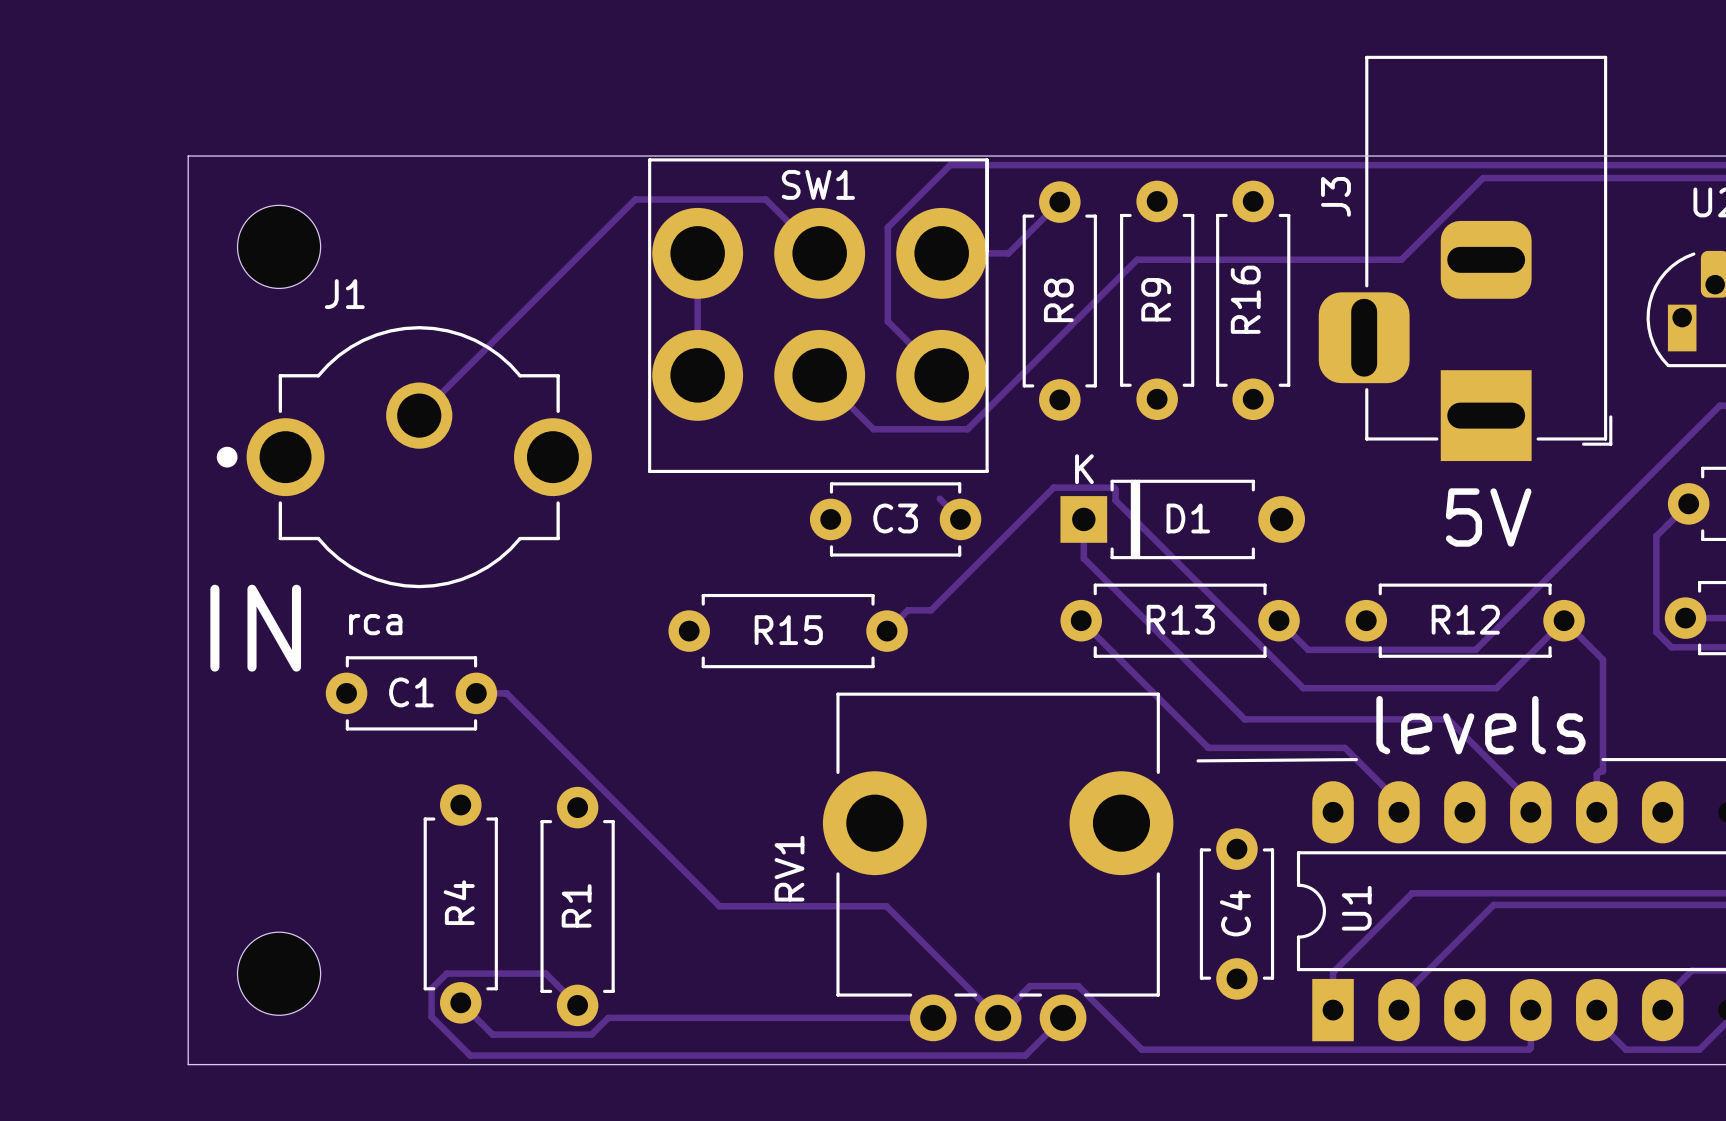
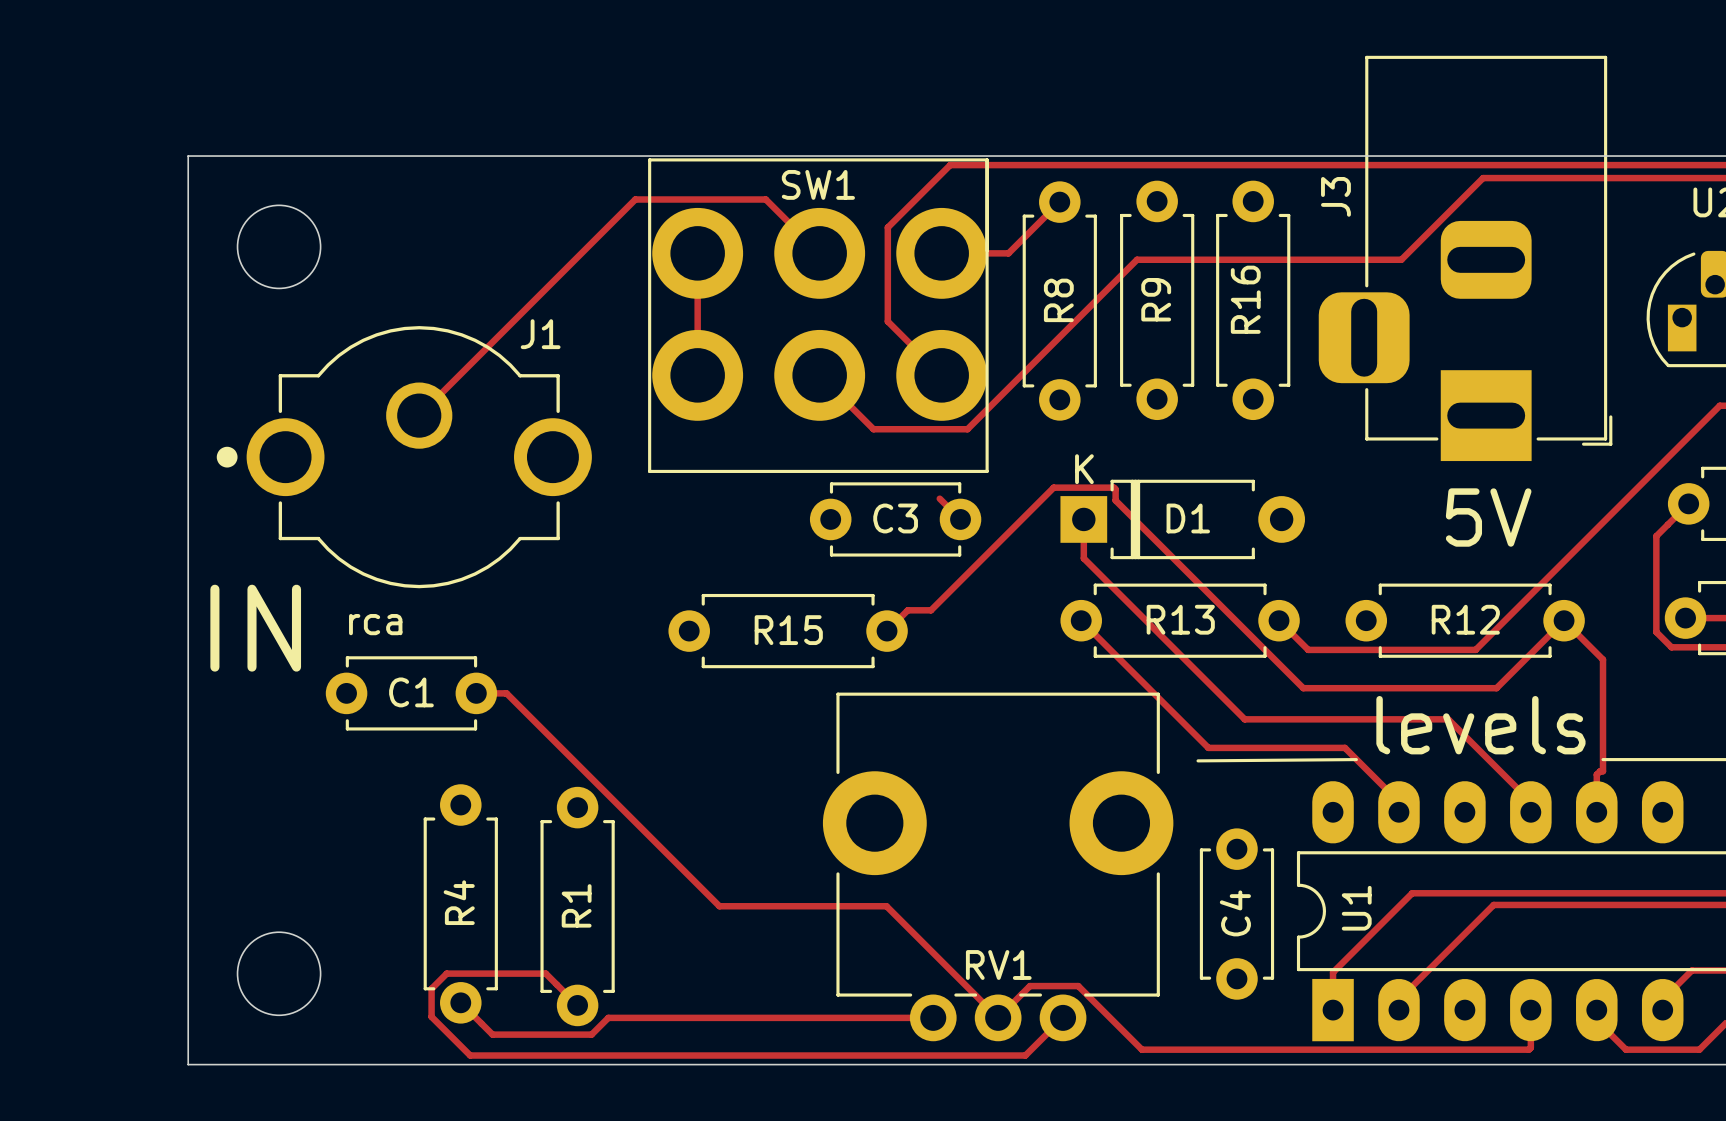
J1 name position: J1 (344, 294) -> J1 (540, 334)
RV1 name rotation: 0° (789, 868) -> 90° clockwise (998, 964)
RV1 name position: RV1 (789, 868) -> RV1 (998, 964)

